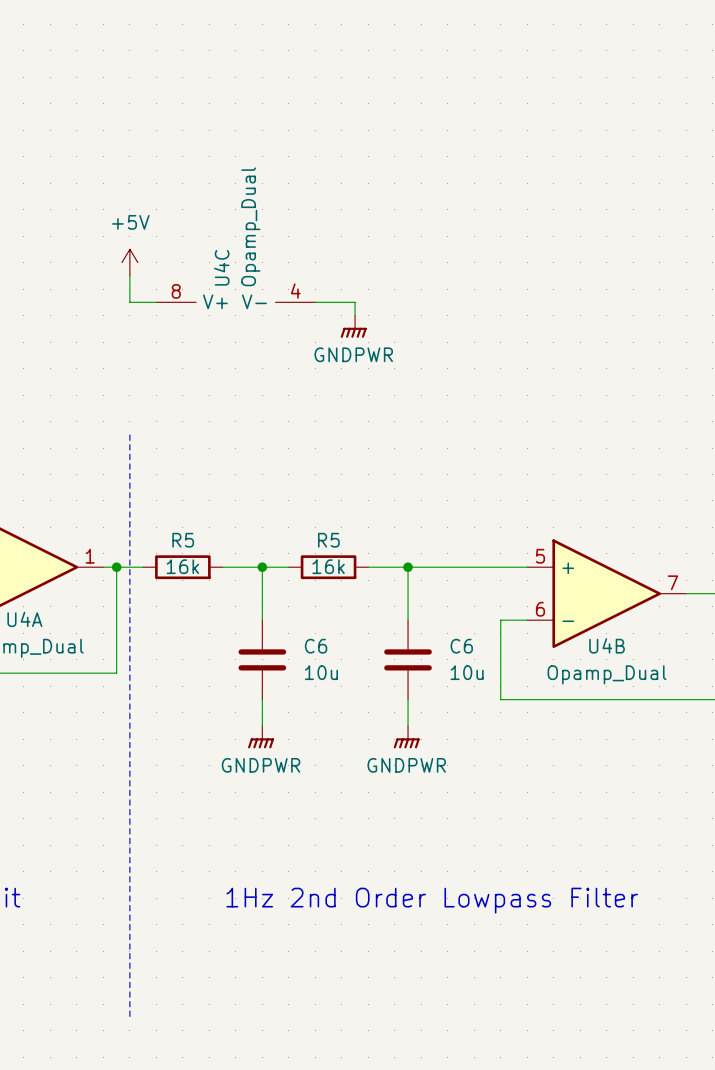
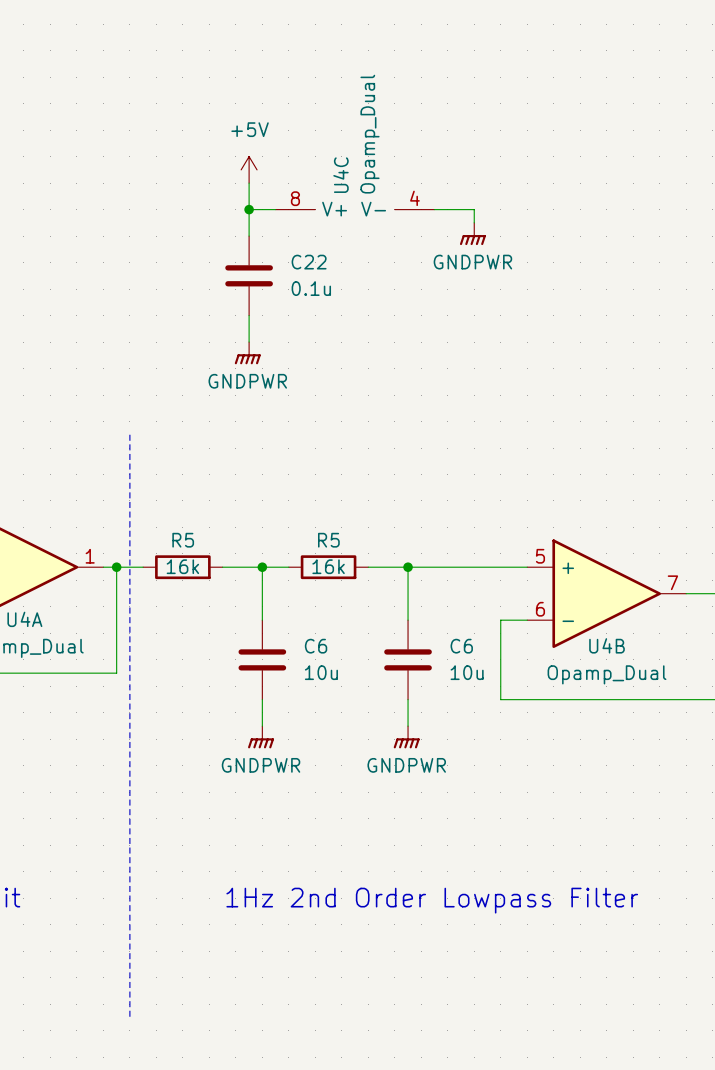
wire: none -> (249, 183) (249, 236)
wire: none -> (249, 209) (275, 209)
junction: none -> (249, 209)
power symbol: none -> GNDPWR (472, 233)
power symbol position: +5V (129, 262) -> +5V (249, 169)
wire: (129, 275) (129, 302) (156, 302) -> none
C22: none -> 0.1u (249, 275)
U4C position: (235, 302) -> (355, 209)
wire: (315, 302) (355, 302) (355, 315) -> (434, 209) (474, 209) (474, 222)
wire: none -> (249, 315) (249, 342)
power symbol: GNDPWR (353, 326) -> none
power symbol: none -> GNDPWR (247, 353)

